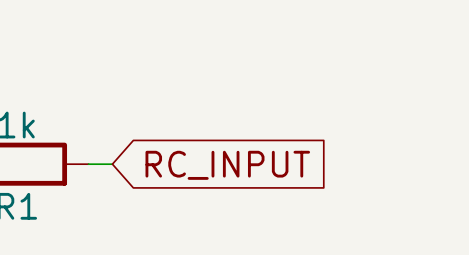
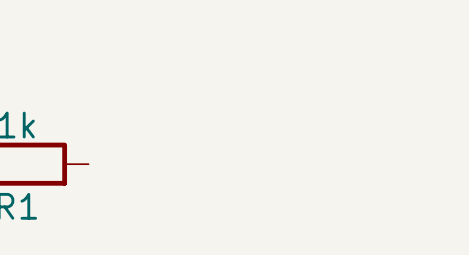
wire: (88, 164) (112, 164) -> none
global label: RC_INPUT (227, 165) -> none

